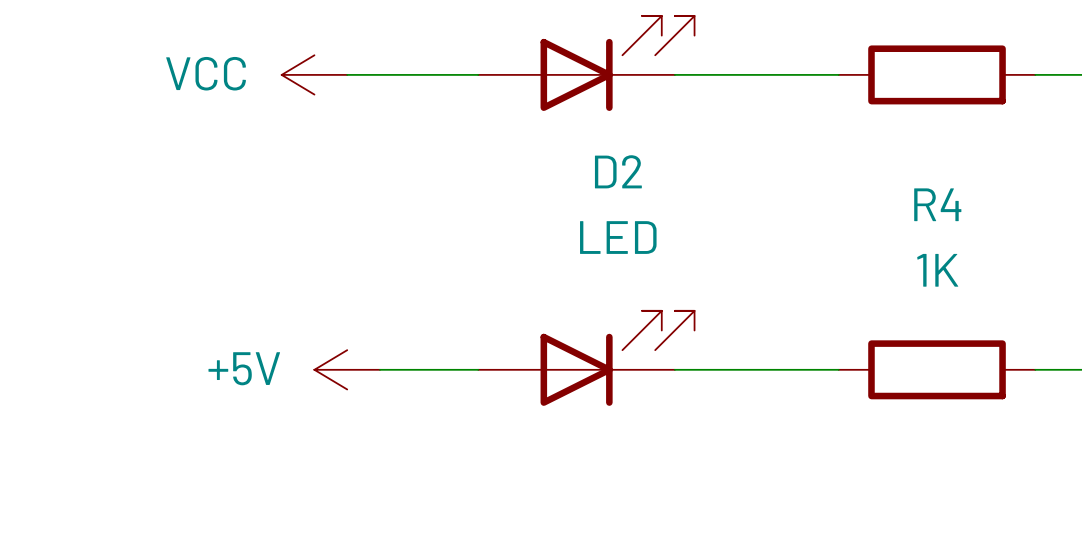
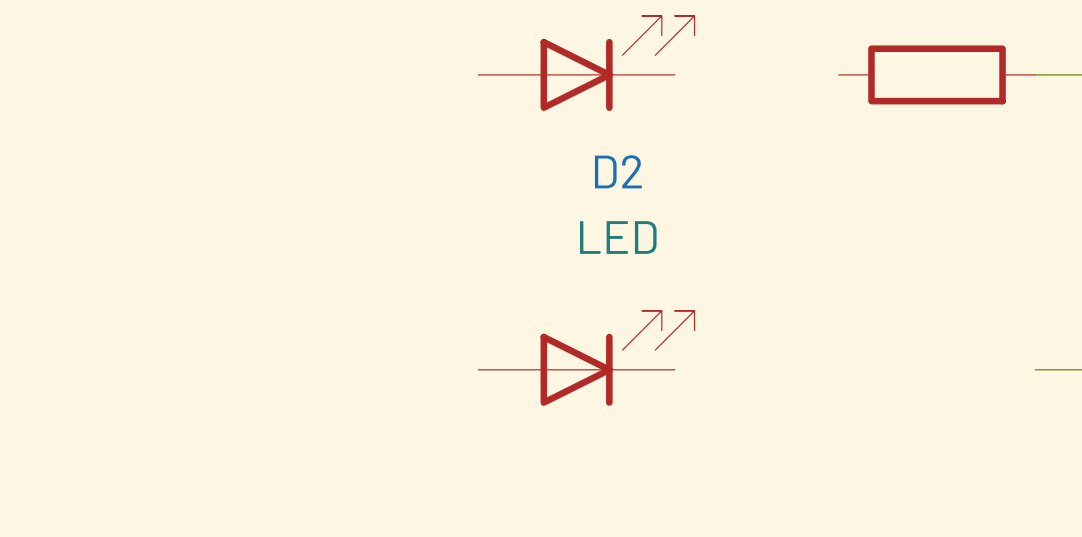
power symbol: VCC (314, 74) -> none
wire: (347, 74) (478, 74) -> none
wire: (674, 74) (838, 74) -> none
power symbol: +5V (347, 369) -> none
wire: (379, 369) (478, 369) -> none
wire: (674, 369) (838, 369) -> none
R4: 1K (937, 369) -> none

